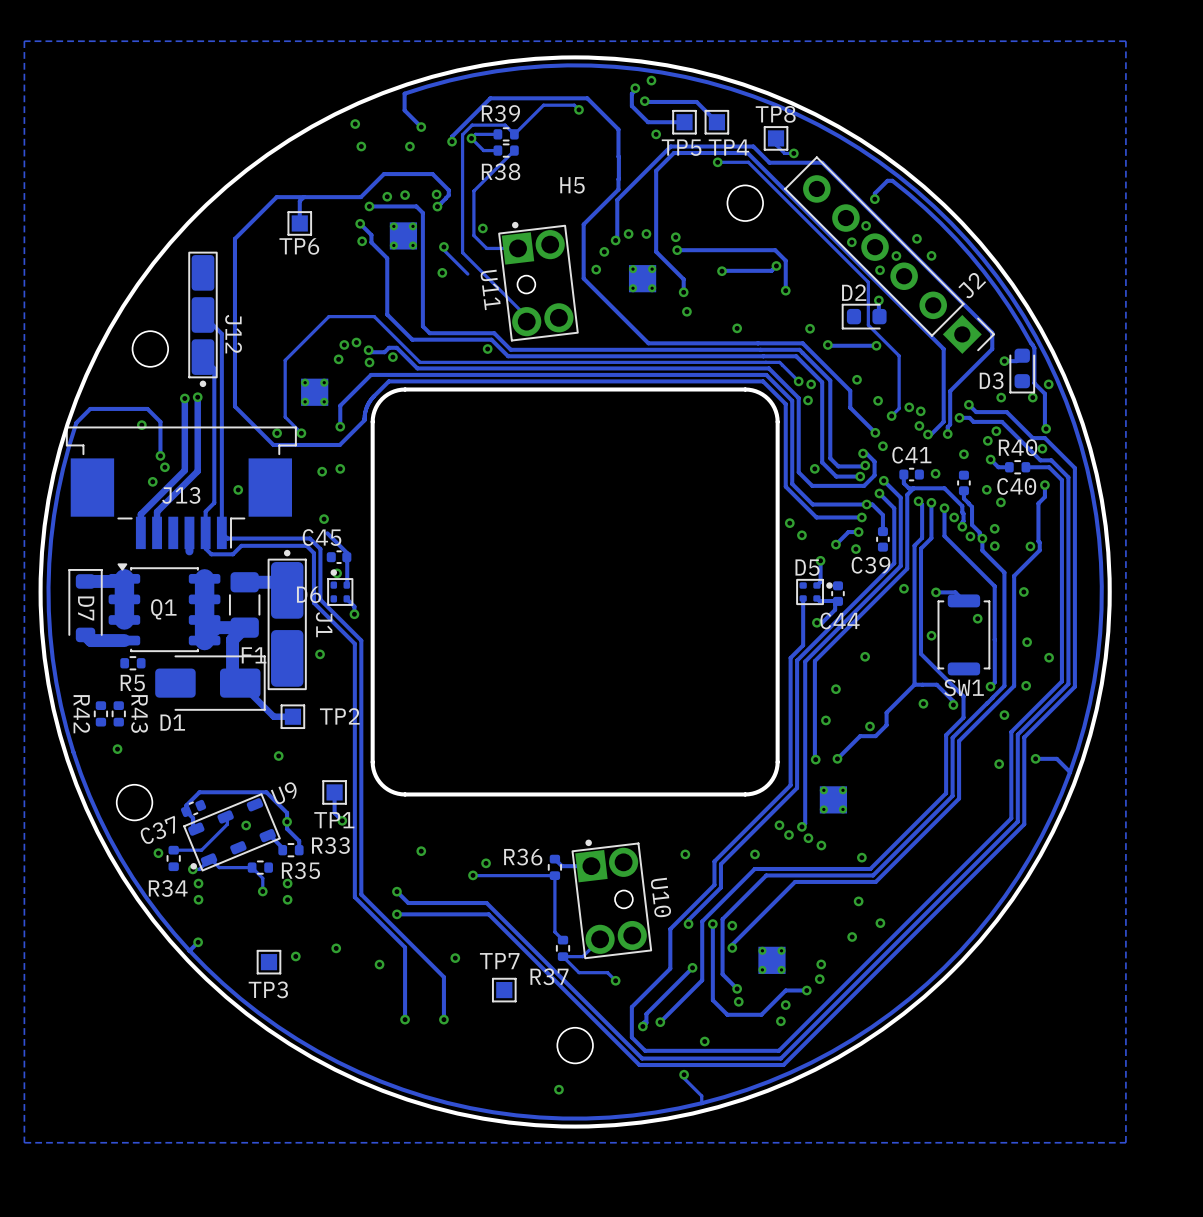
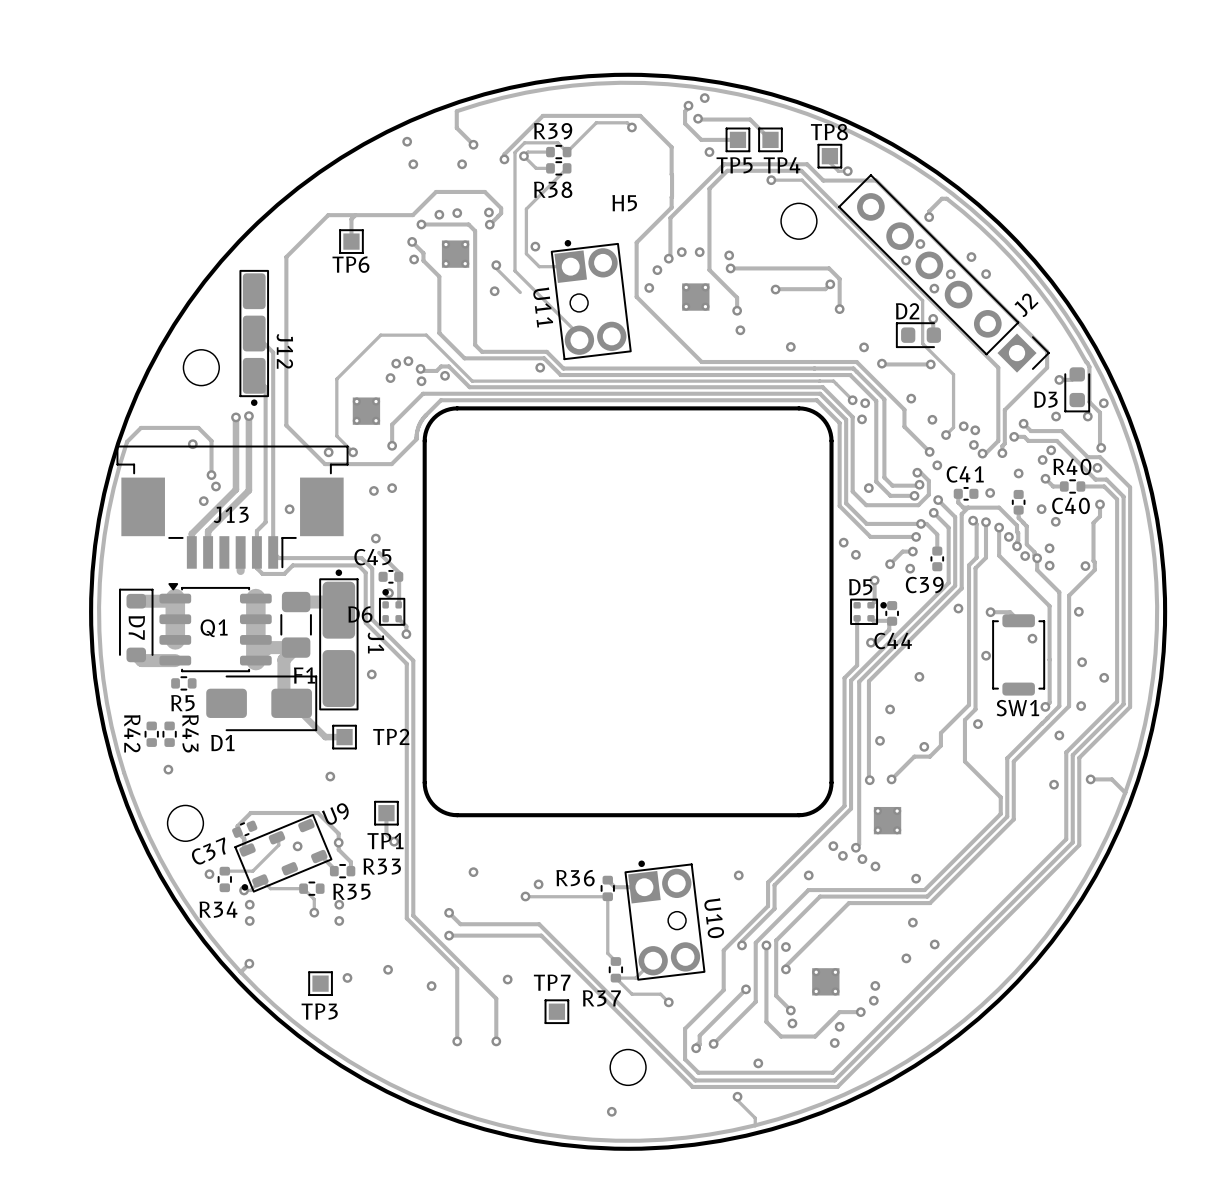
zone outline: (1125, 41) (24, 41) (24, 1142) (1125, 1142) (1125, 41) -> none
track: (921, 653) (963, 696) (963, 717) (946, 735) (946, 776) -> (975, 674) (975, 709) (964, 720) (964, 761) (1000, 797)
track: (914, 684) (936, 684) (953, 701) (953, 704) -> none
via: (953, 704) -> none

